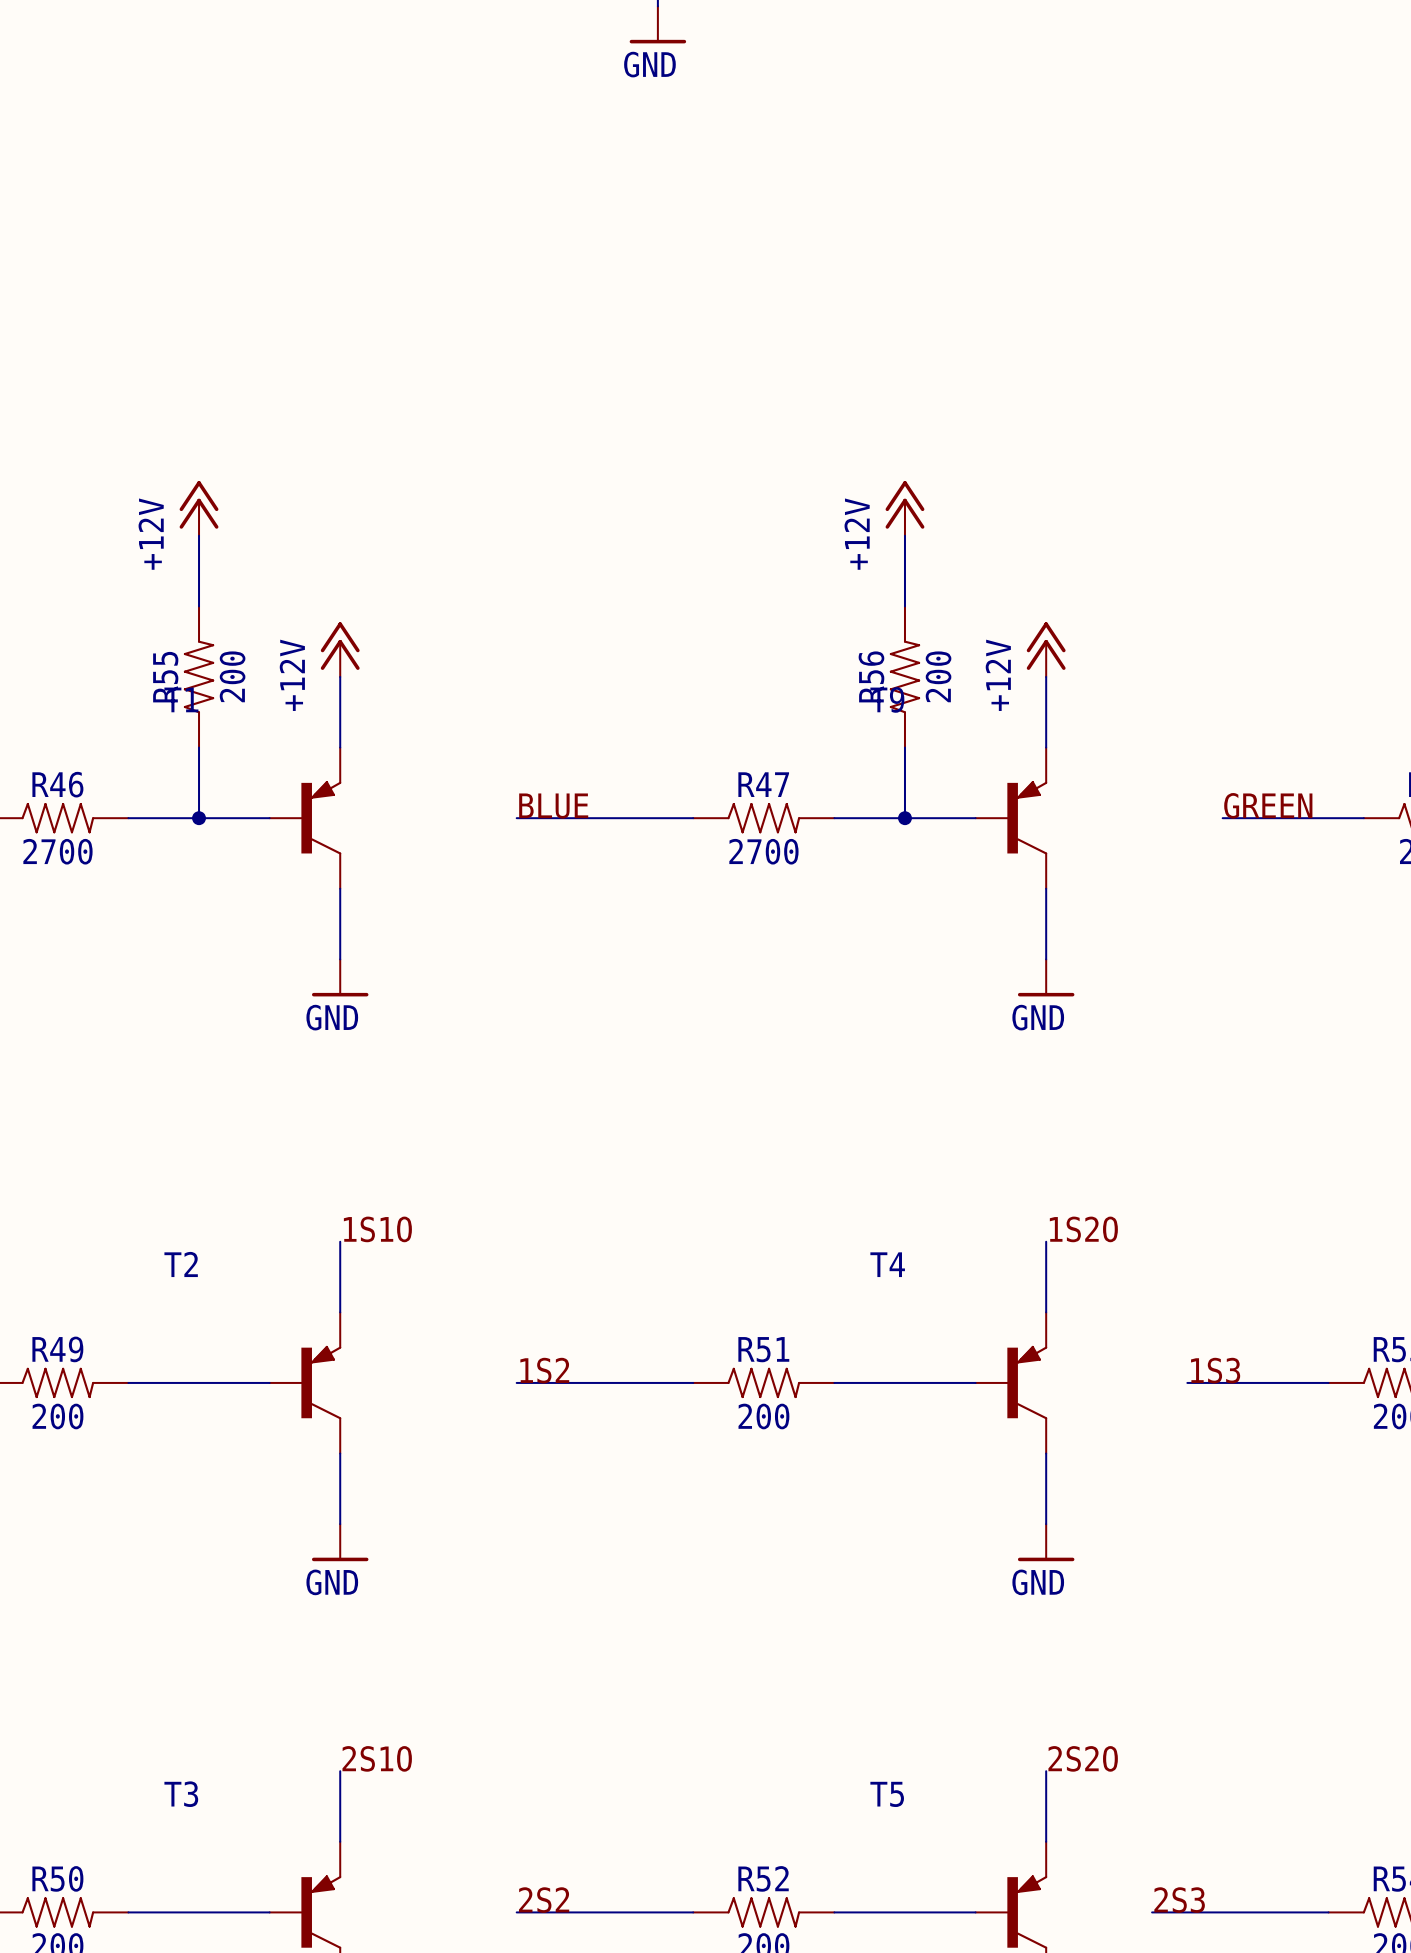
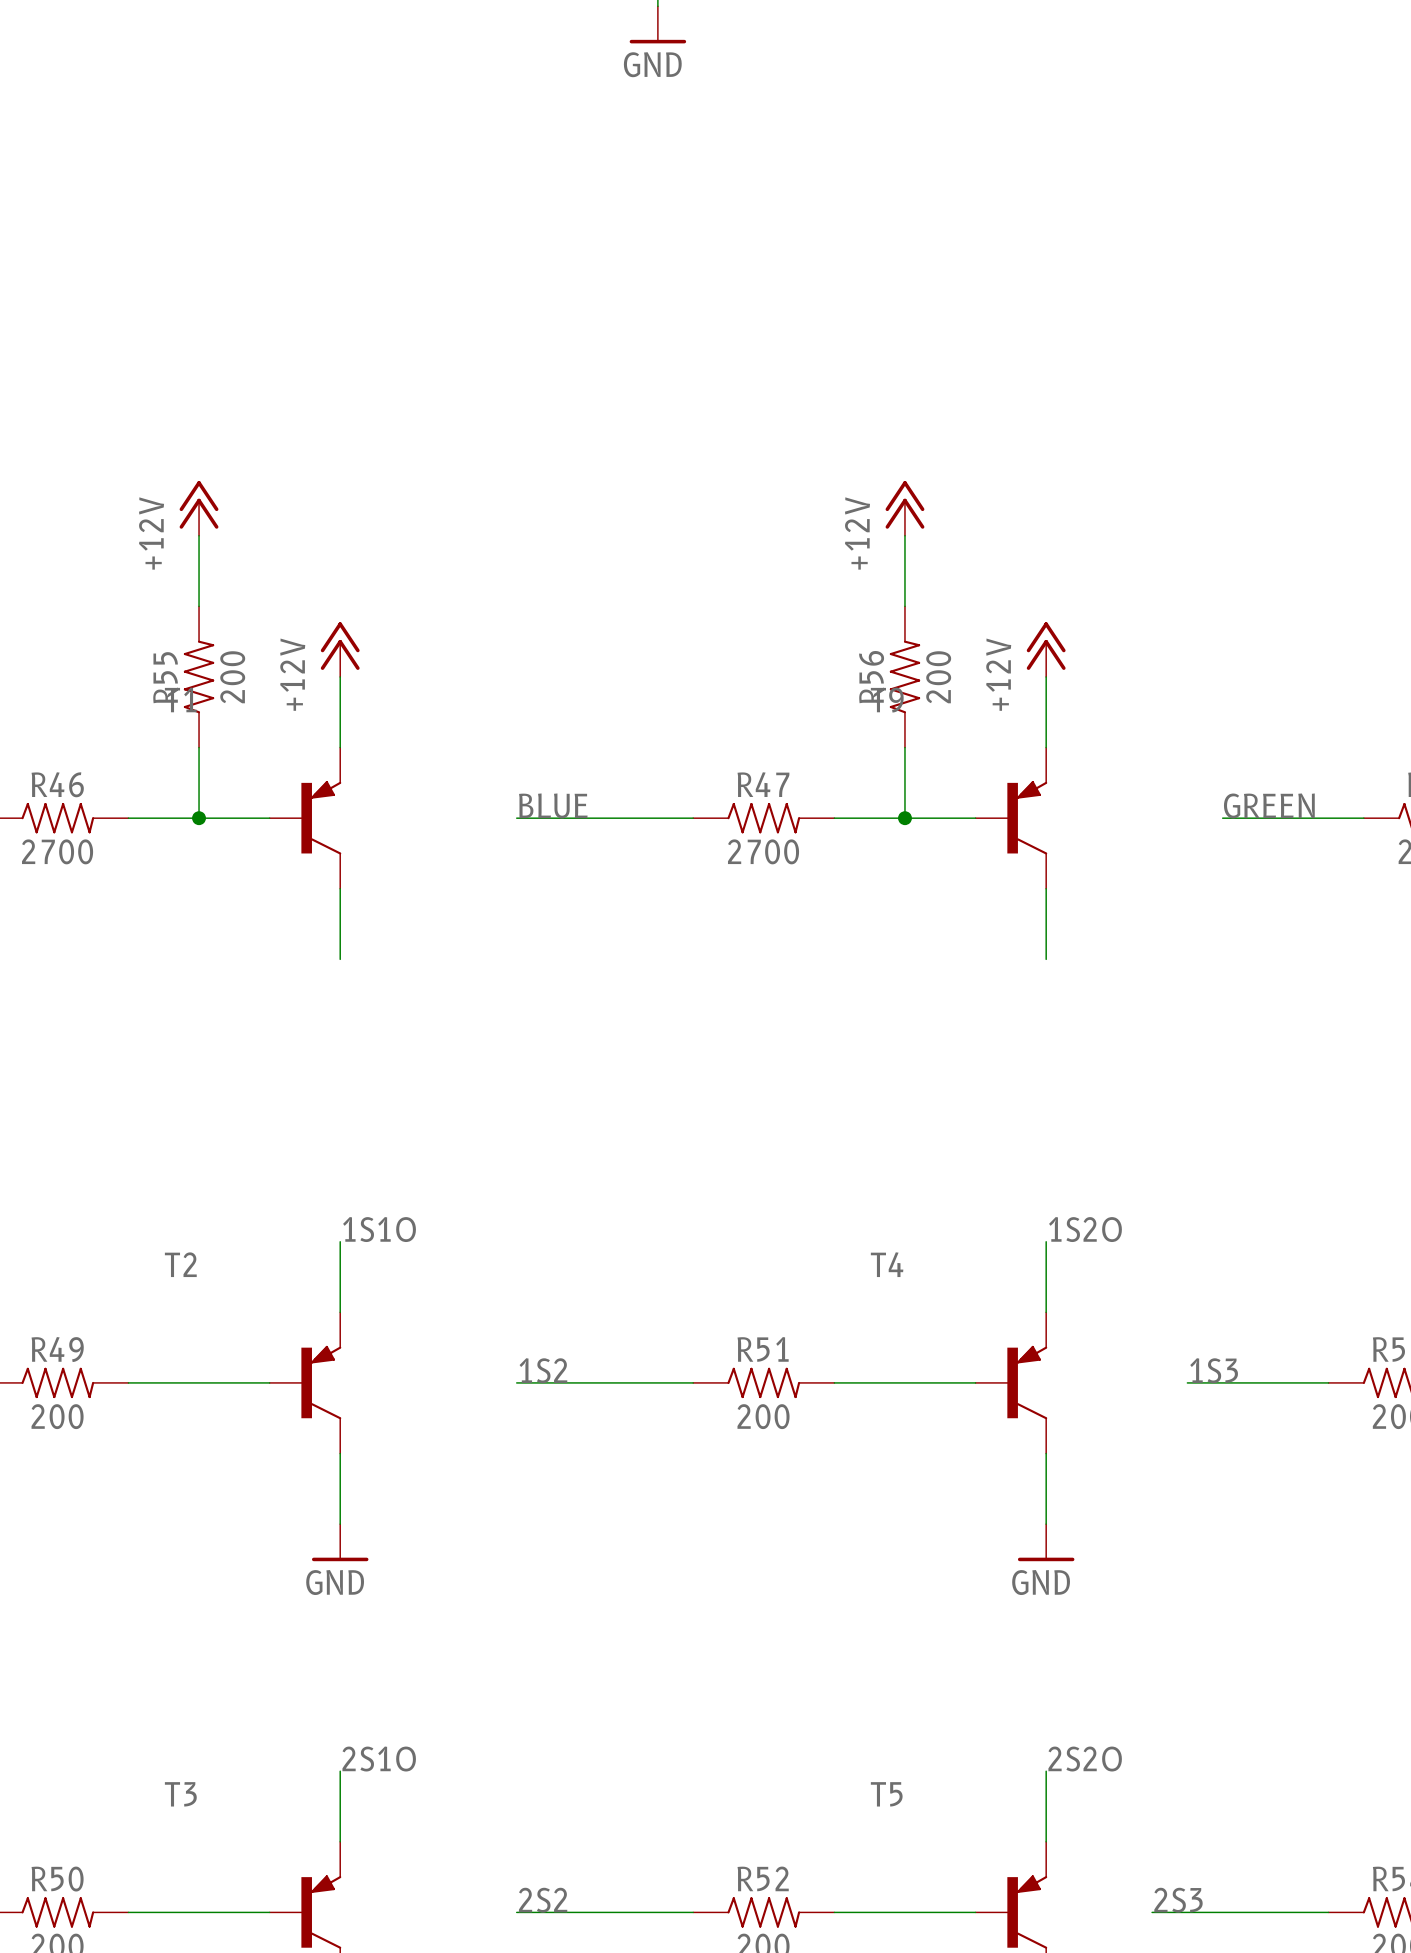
power symbol: GND (340, 977) -> none
power symbol: GND (1046, 977) -> none

